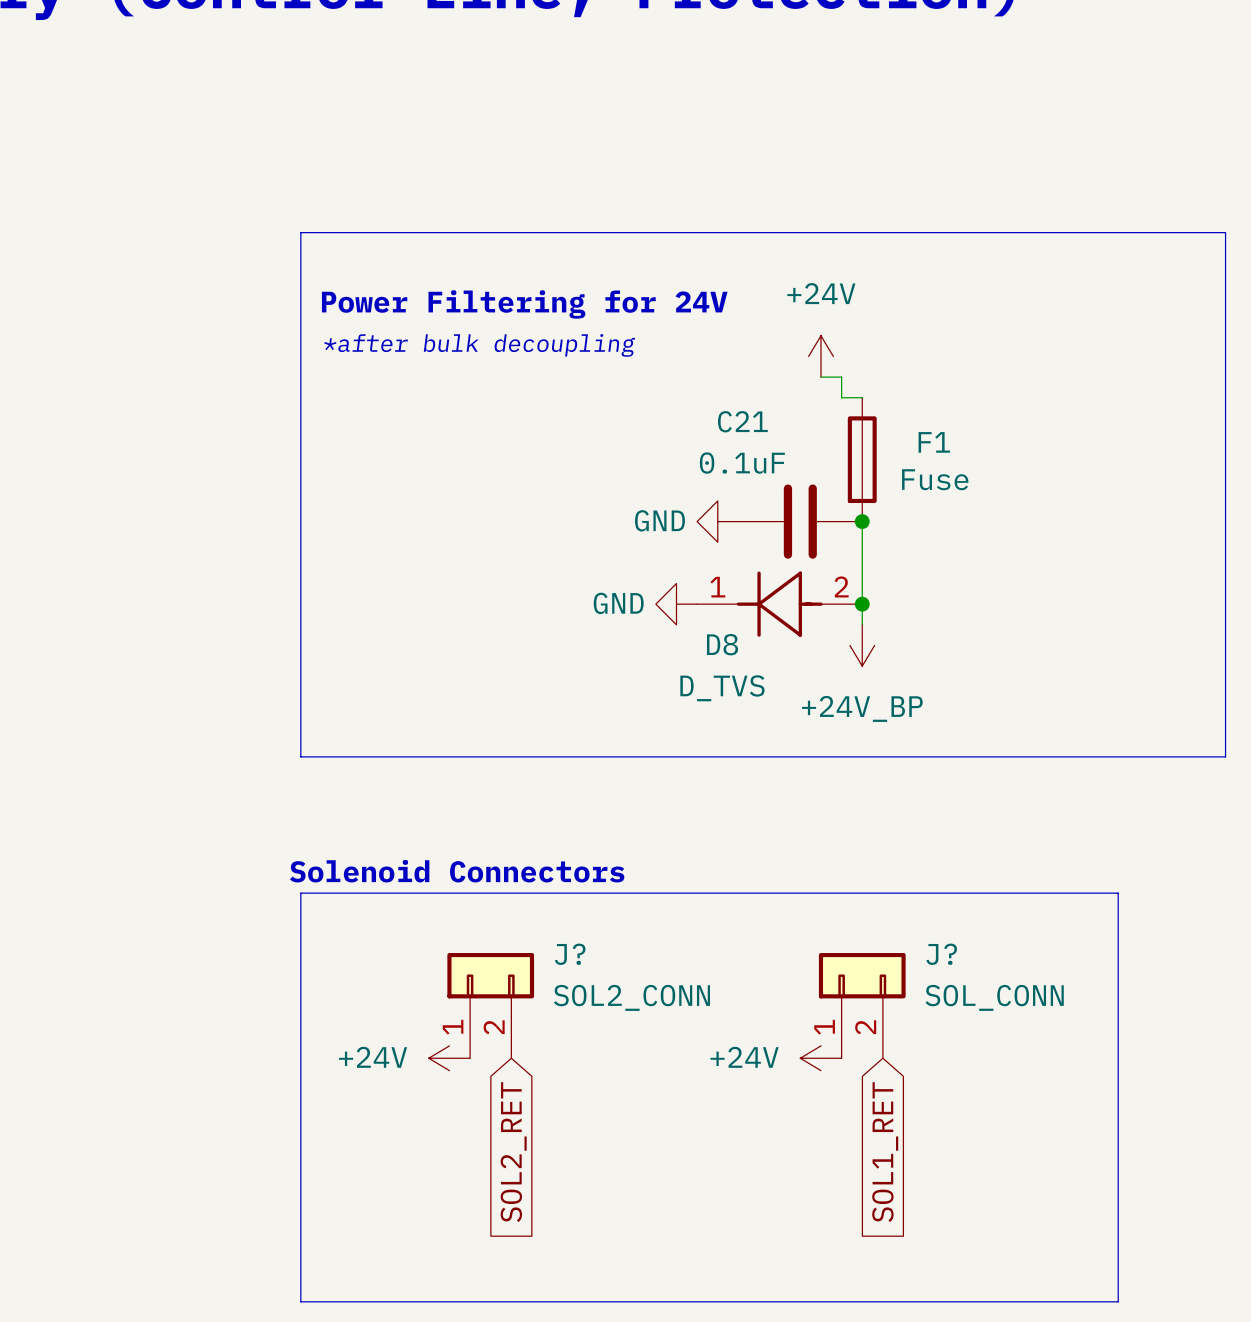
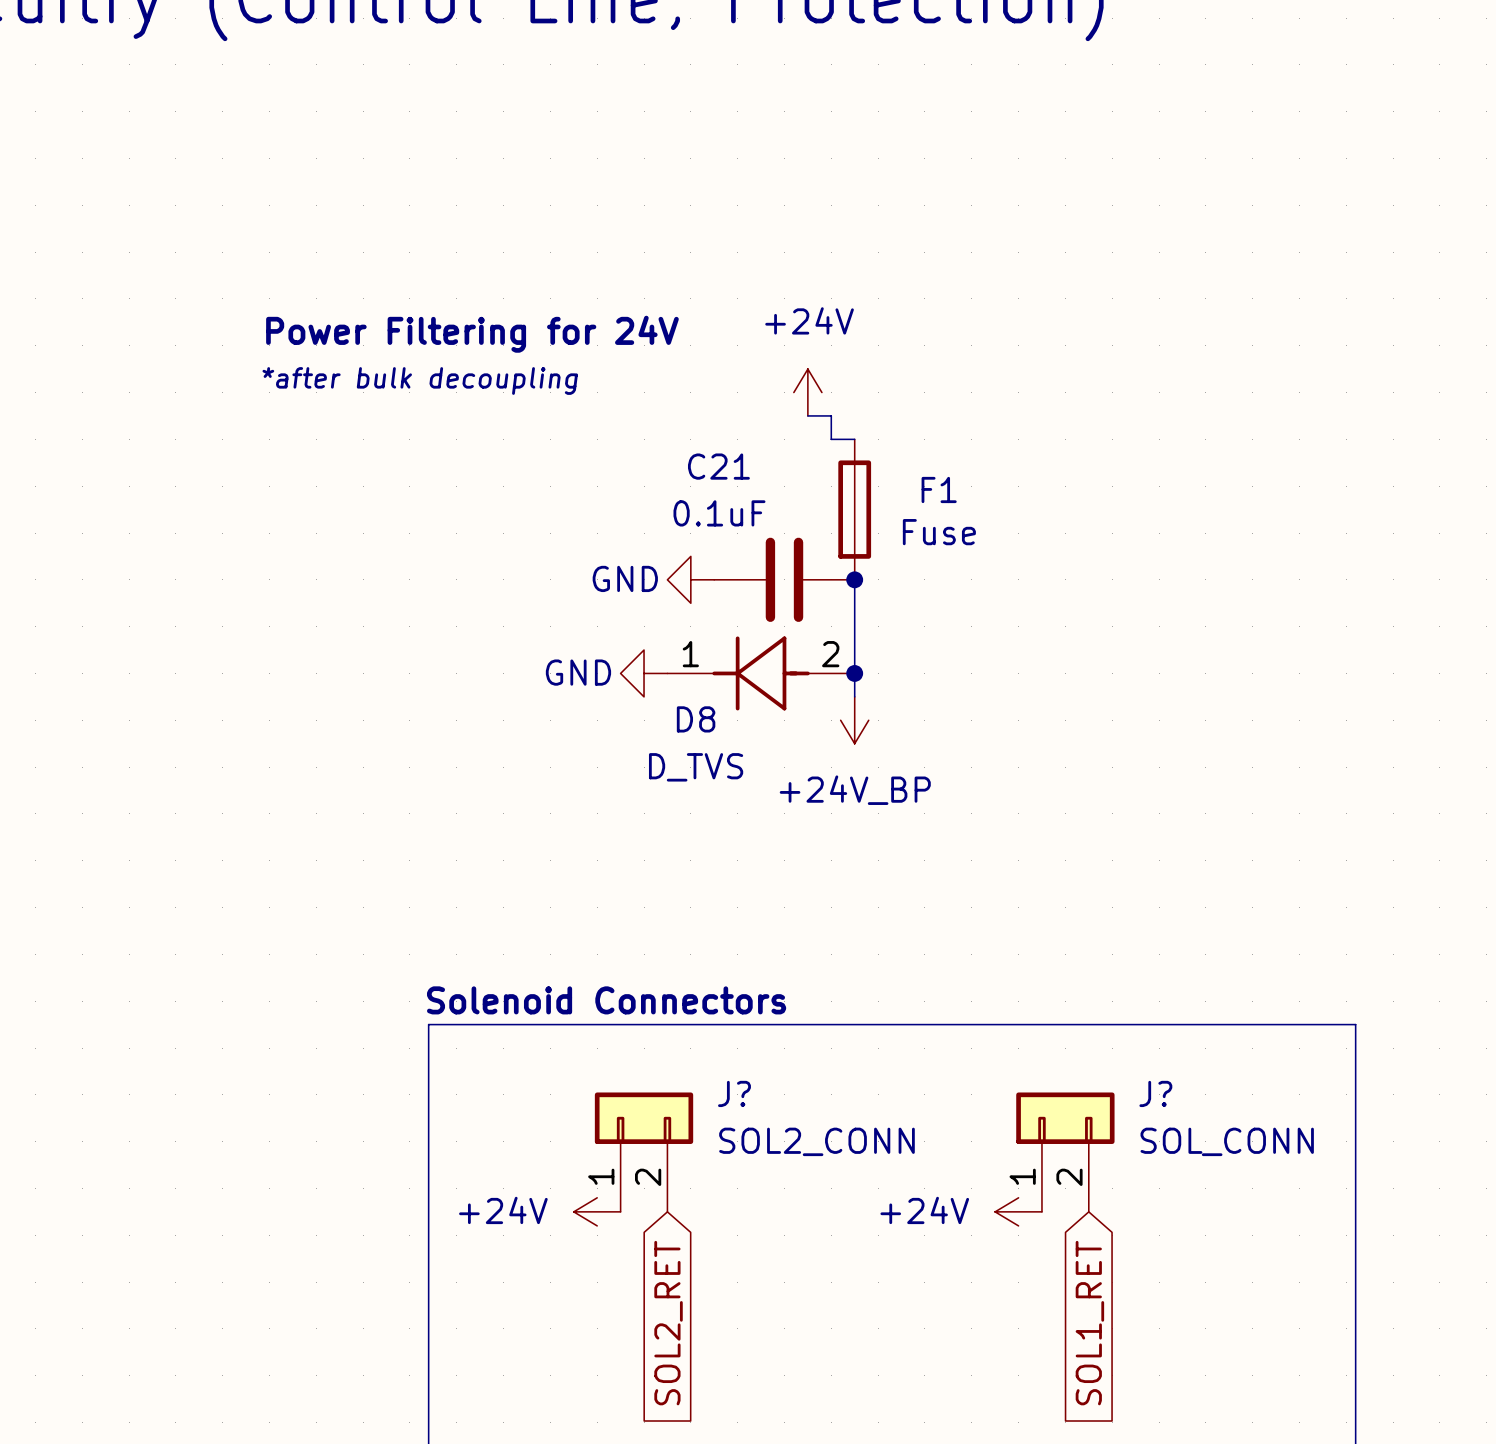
line: (300, 232) (1225, 232) (1225, 756) (300, 756) (300, 232) -> none
text position: Power Filtering for 24V (524, 304) -> Power Filtering for 24V (472, 334)
text position: *after bulk decoupling (479, 345) -> *after bulk decoupling (420, 380)
power symbol position: +24V (820, 356) -> +24V (807, 392)
wire: (820, 377) (841, 377) (841, 397) (862, 397) -> (807, 415) (831, 415) (831, 439) (854, 439)
F1 position: (862, 459) -> (854, 509)
power symbol: none -> GND (690, 579)
junction: none -> (854, 579)
power symbol: GND (717, 521) -> none
C21 position: (800, 521) -> (784, 579)
wire: (862, 521) (862, 624) -> (854, 579) (854, 696)
junction: (862, 521) -> none
power symbol: none -> GND (644, 673)
junction: none -> (854, 673)
power symbol: GND (676, 604) -> none
D8 position: (779, 604) -> (761, 673)
junction: (862, 604) -> none
power symbol position: +24V_BP (862, 645) -> +24V_BP (854, 720)

